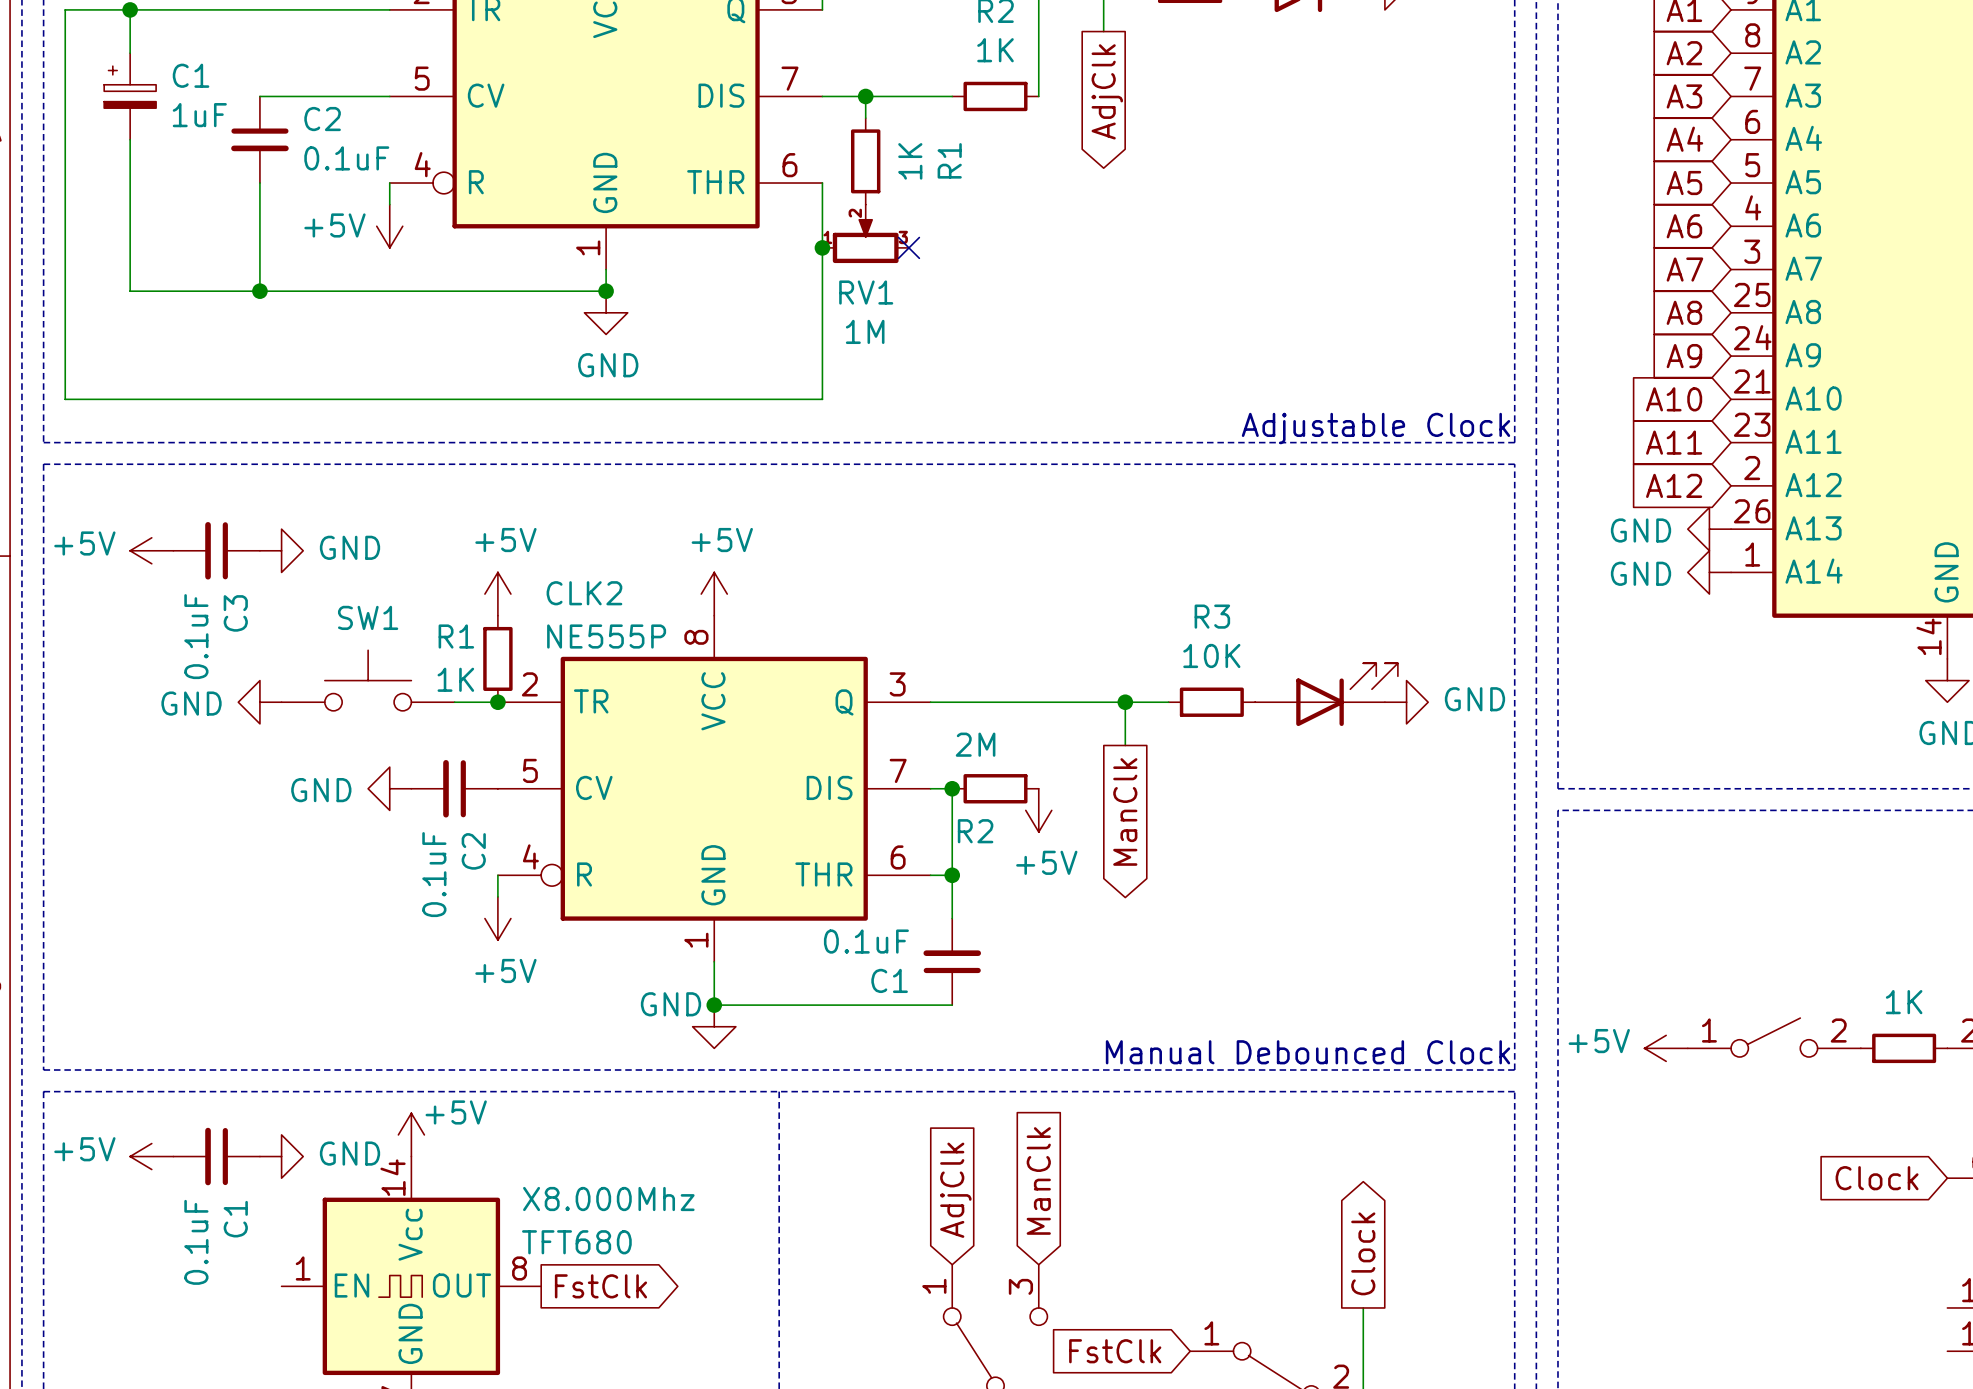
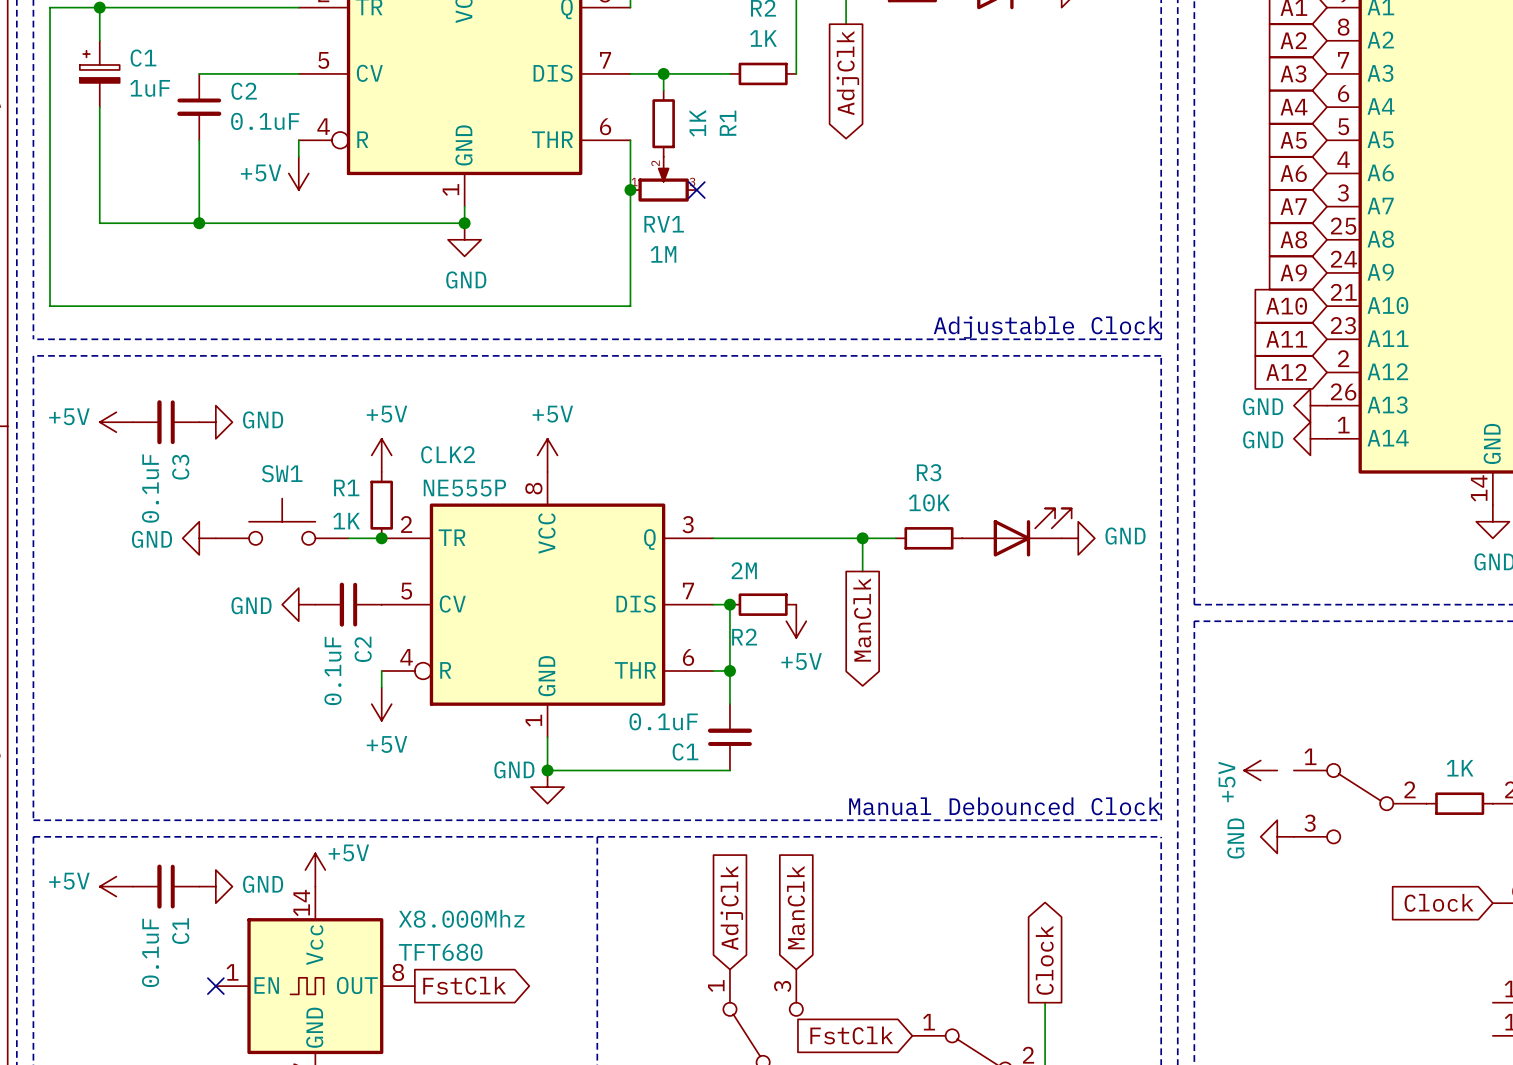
part symbol: [1687, 1018, 1861, 1058] -> [1293, 763, 1427, 844]
power symbol text rotation: 0° (1599, 1041) -> 90° counterclockwise (1227, 781)
power symbol position: +5V (1666, 1048) -> +5V (1260, 770)
power symbol: none -> GND (1277, 836)
no-connect mark: none -> (215, 986)

